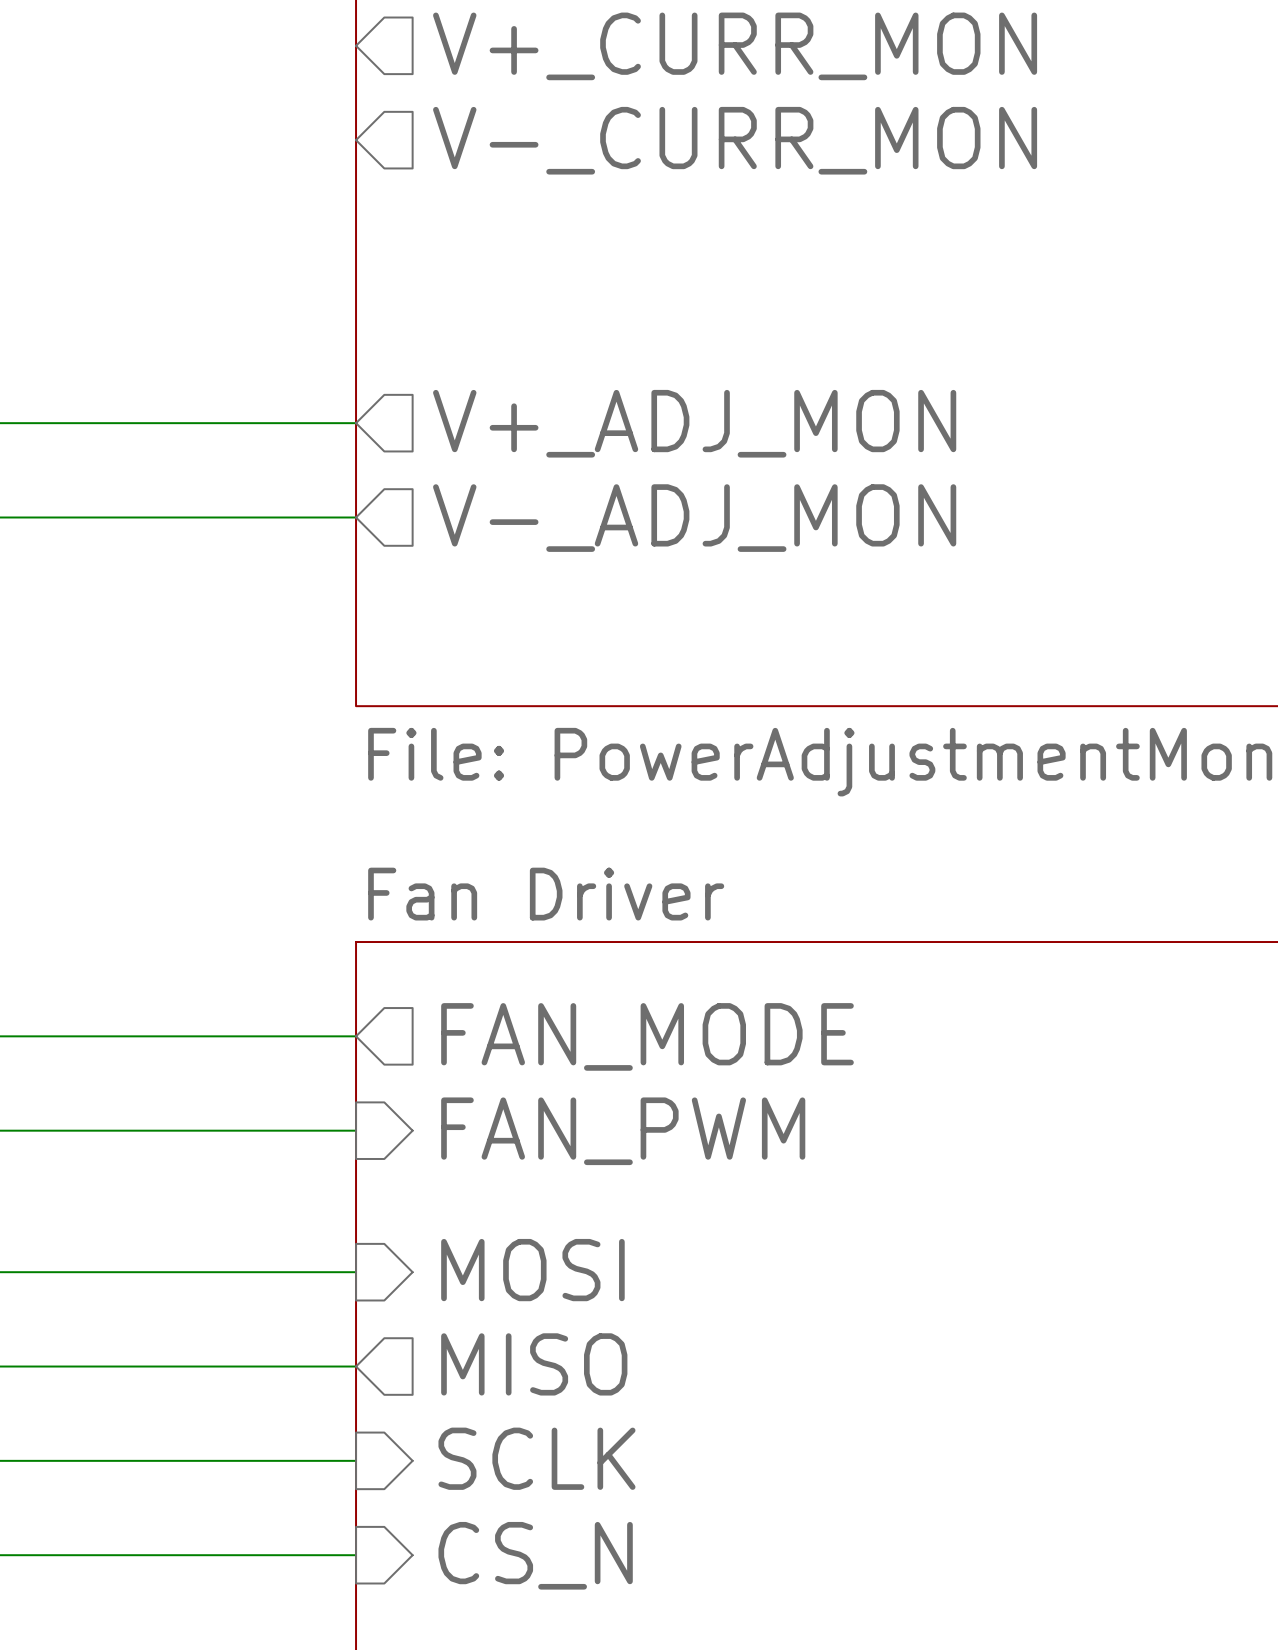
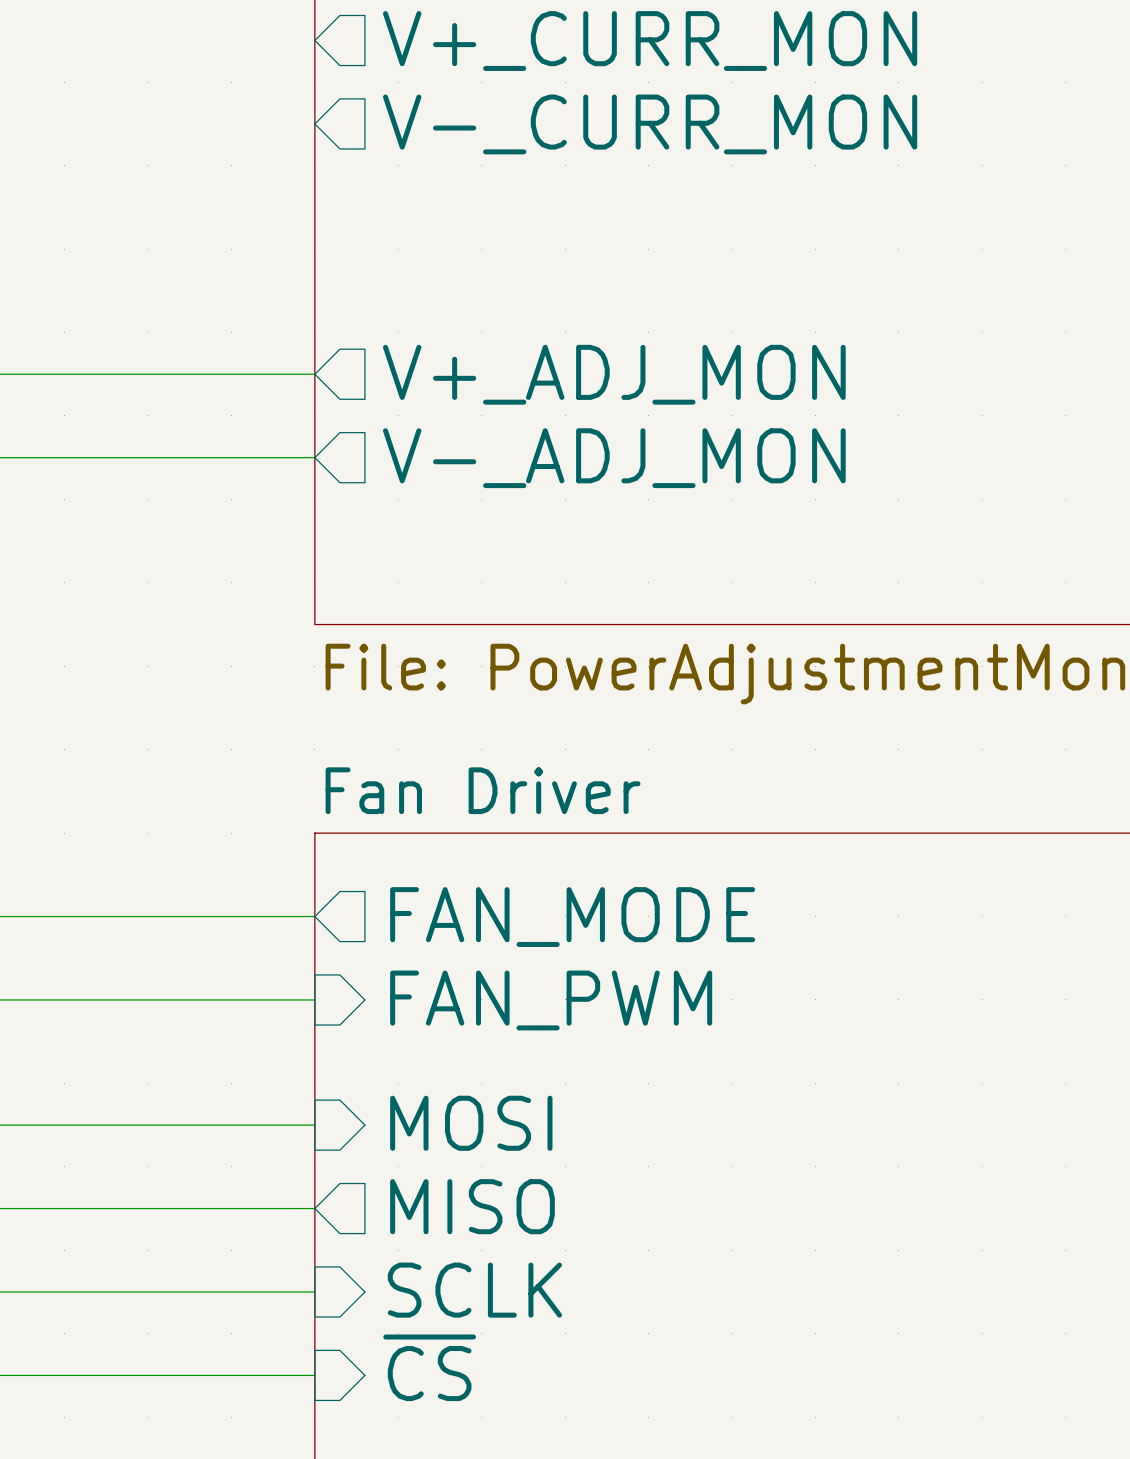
sheet pin: CS_N (535, 1555) -> ~{CS} (429, 1367)

